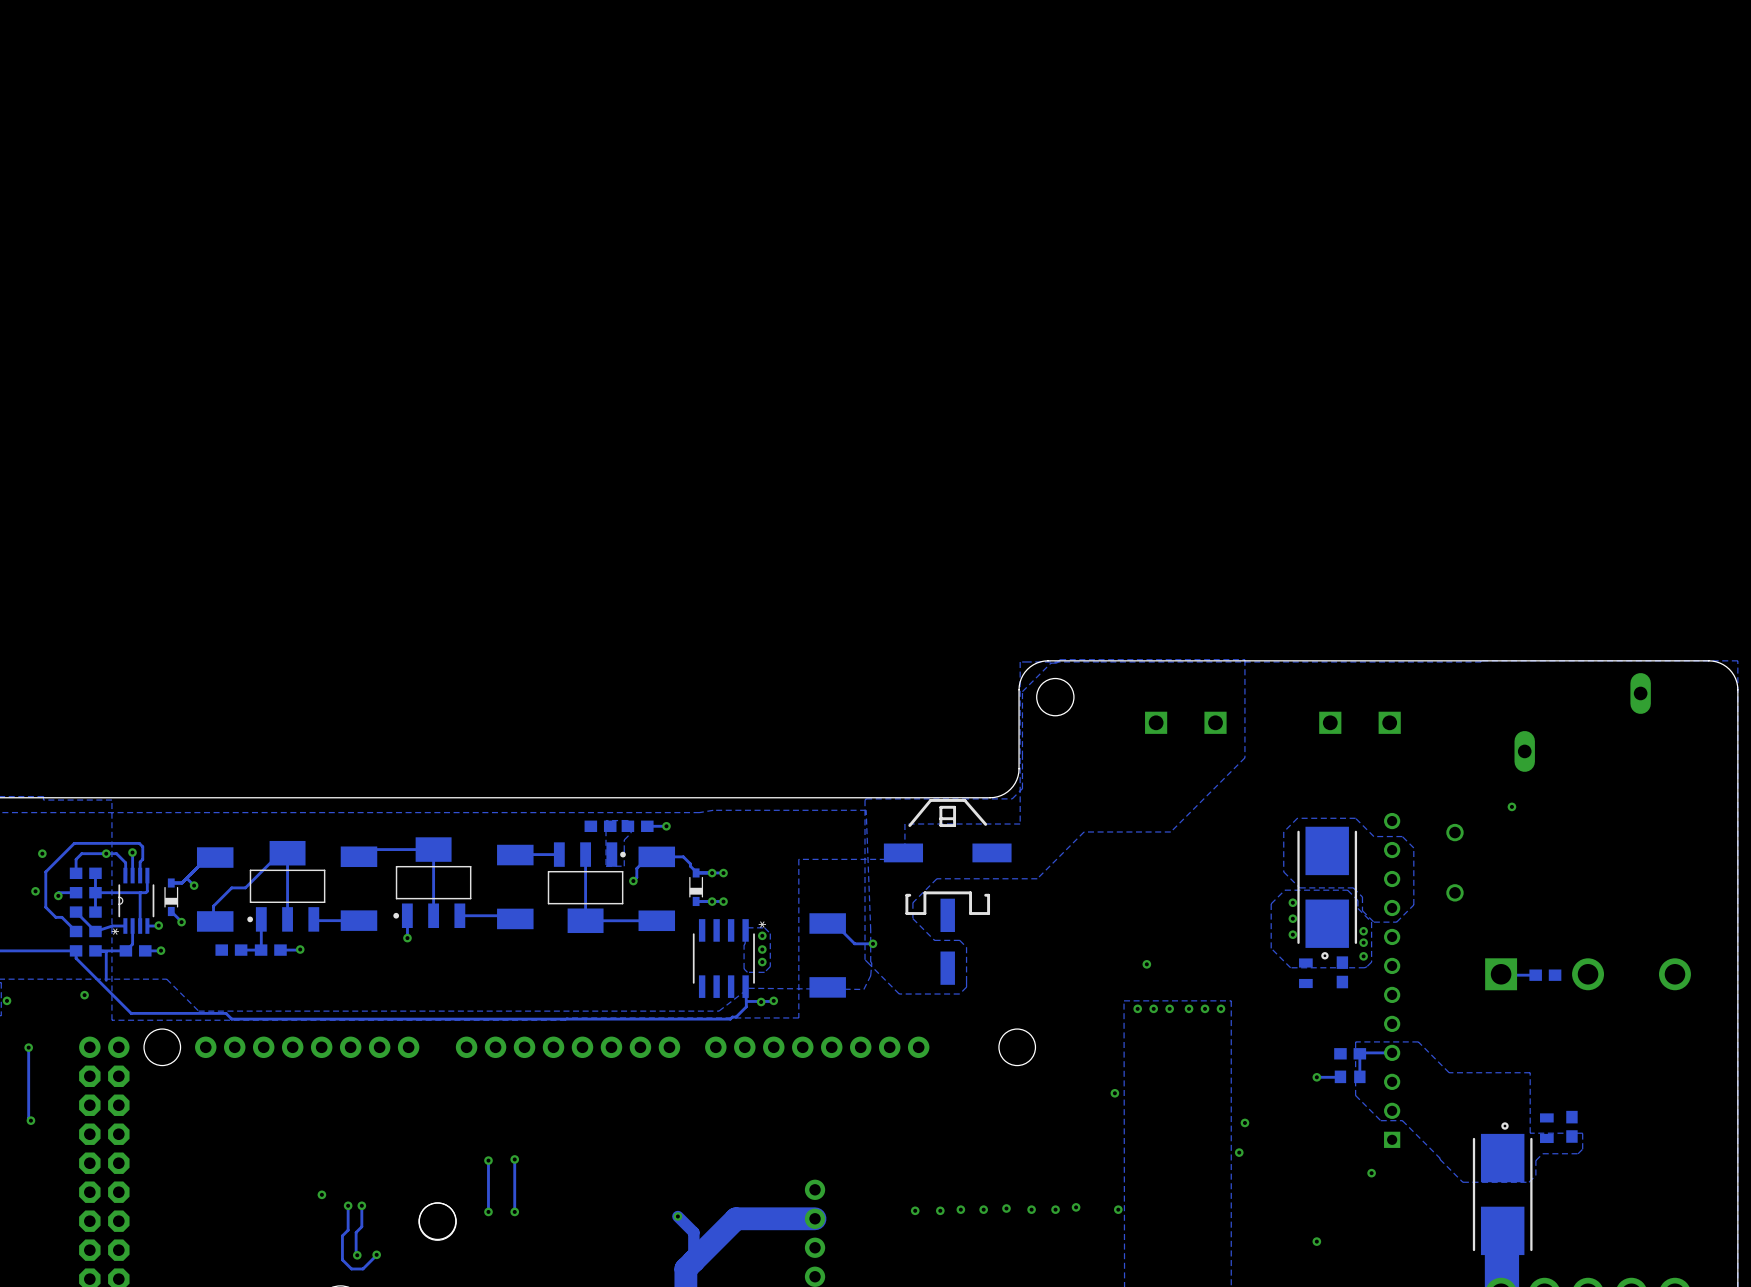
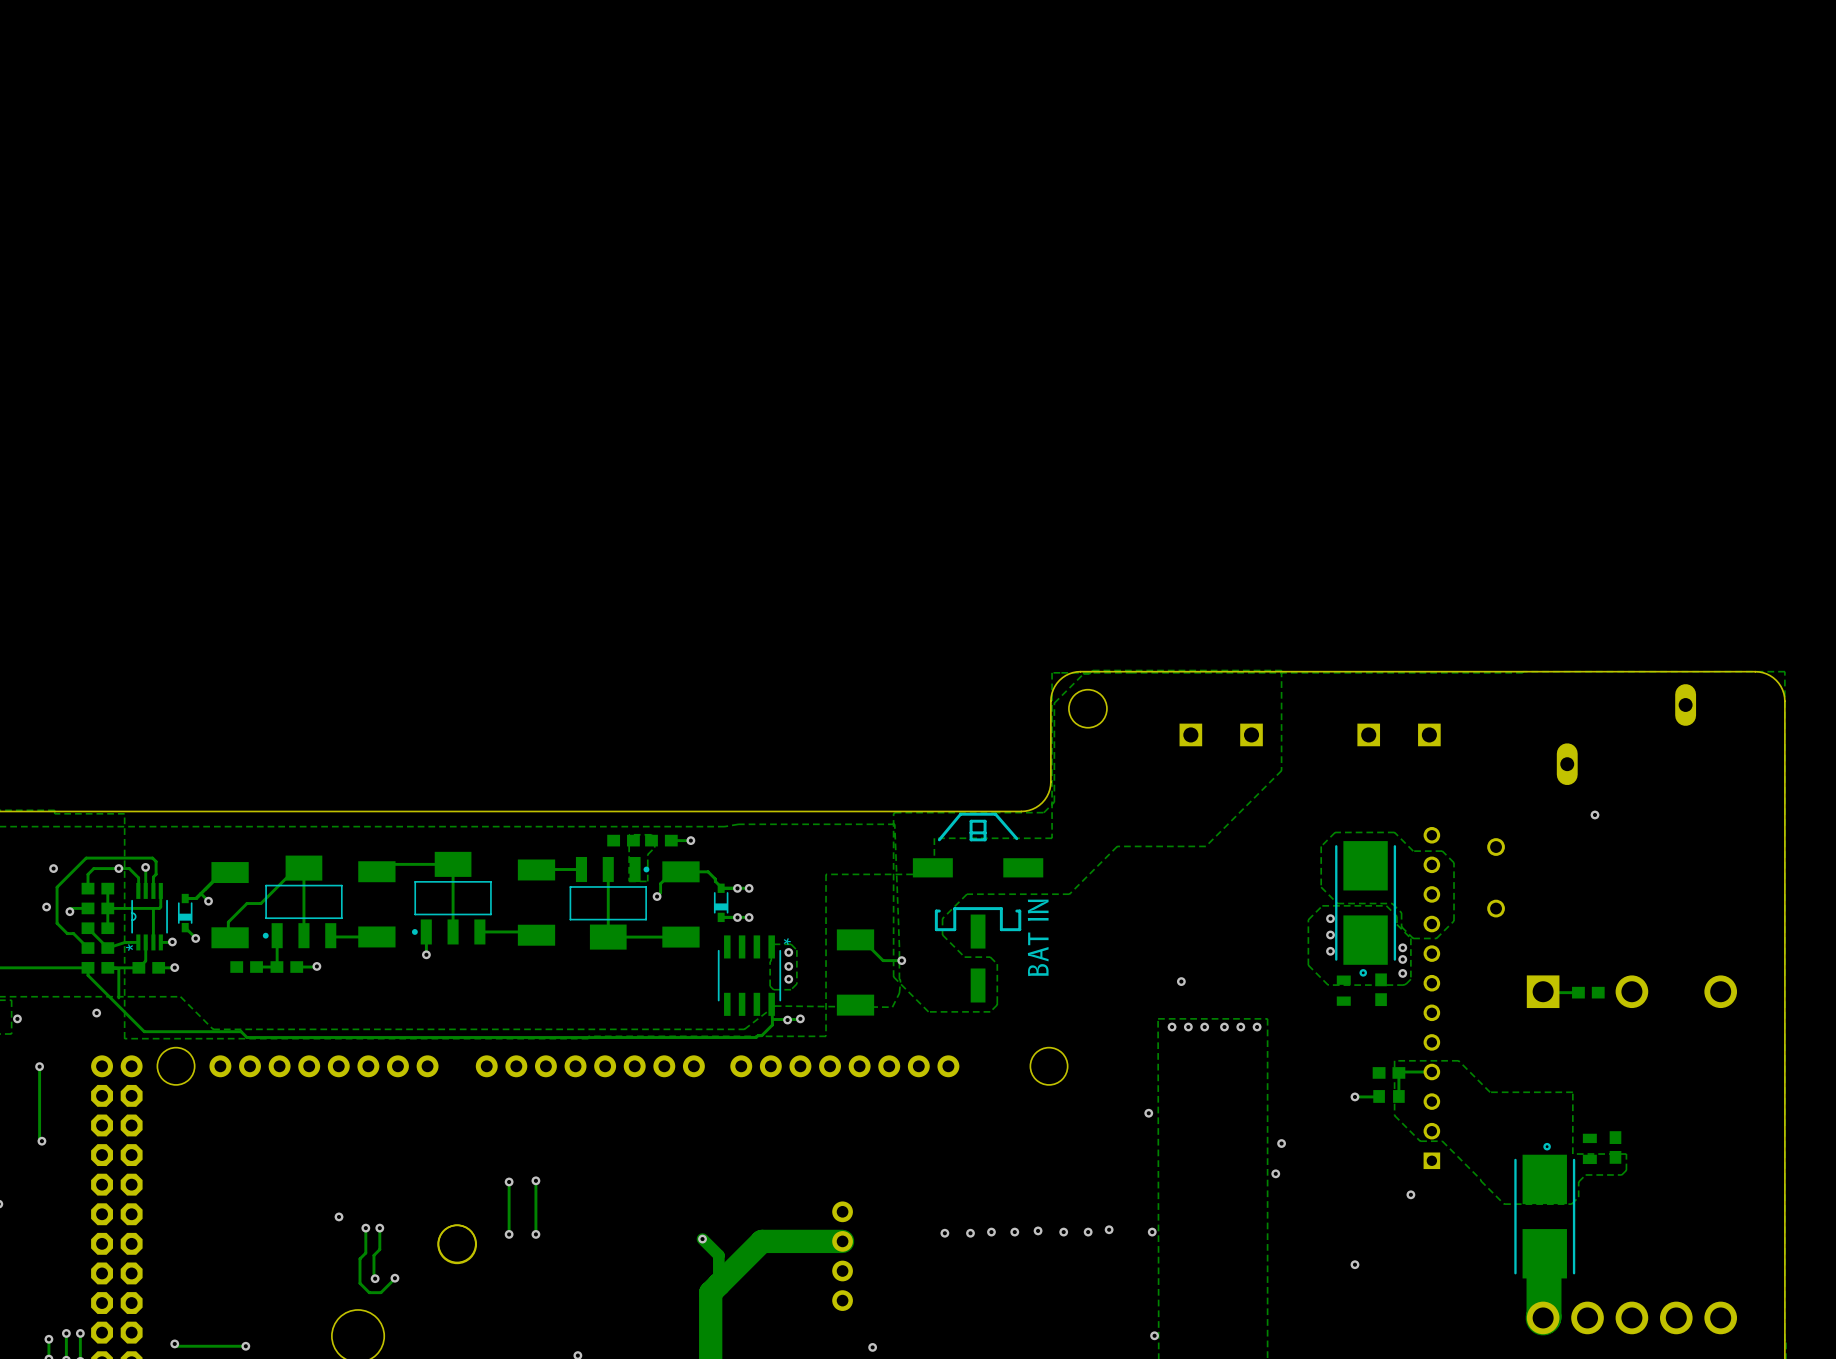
via position: (1511, 806) -> (1594, 814)
text: none -> BAT IN (1038, 937)

